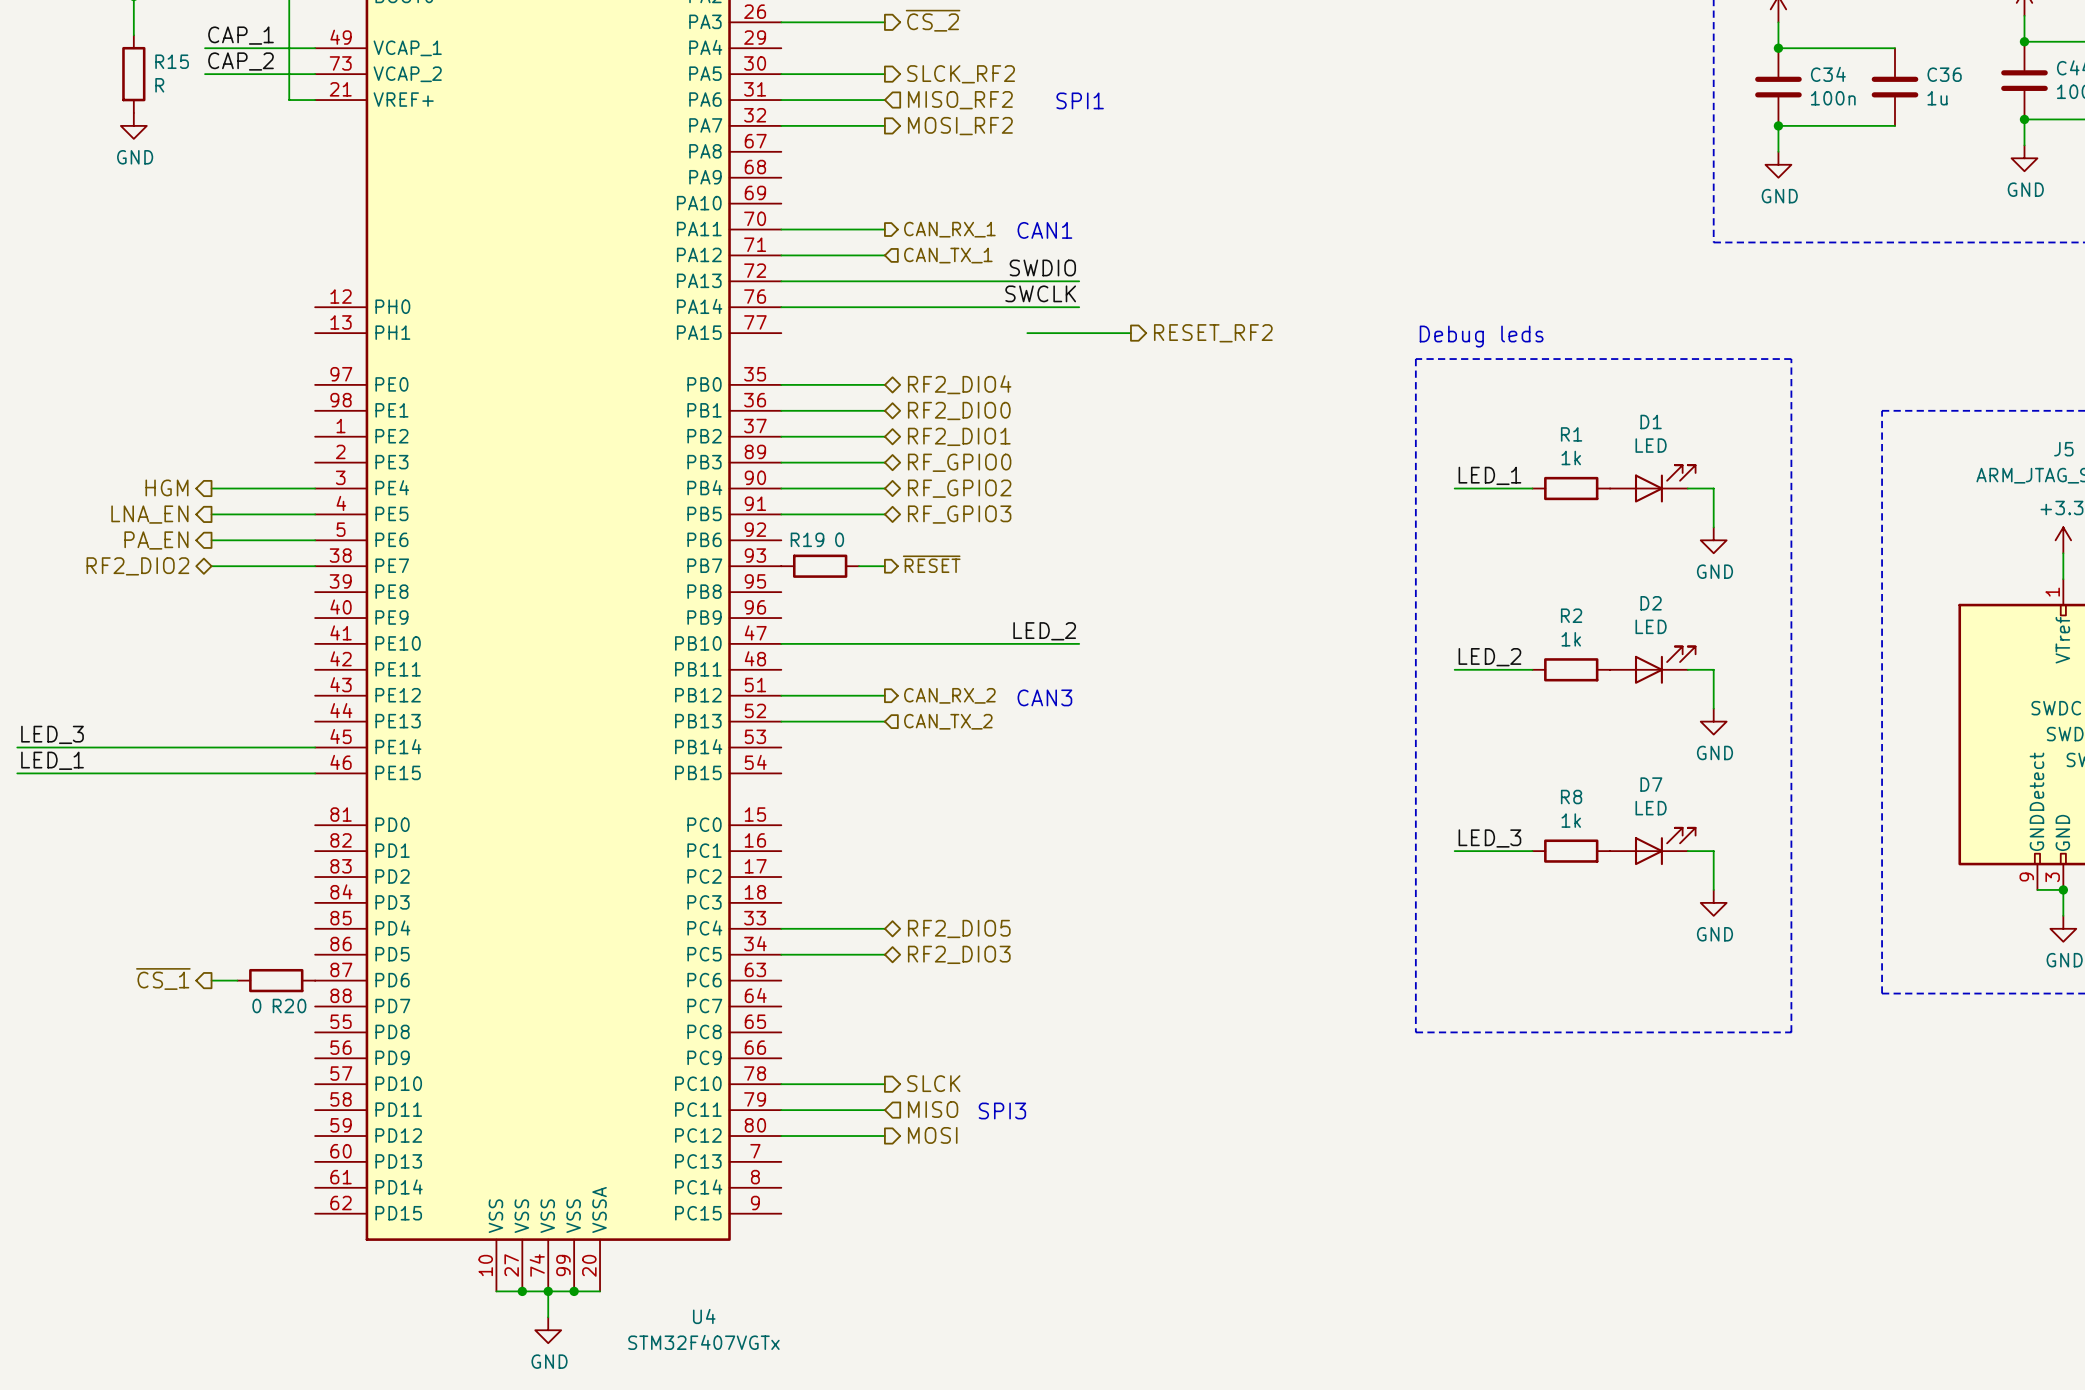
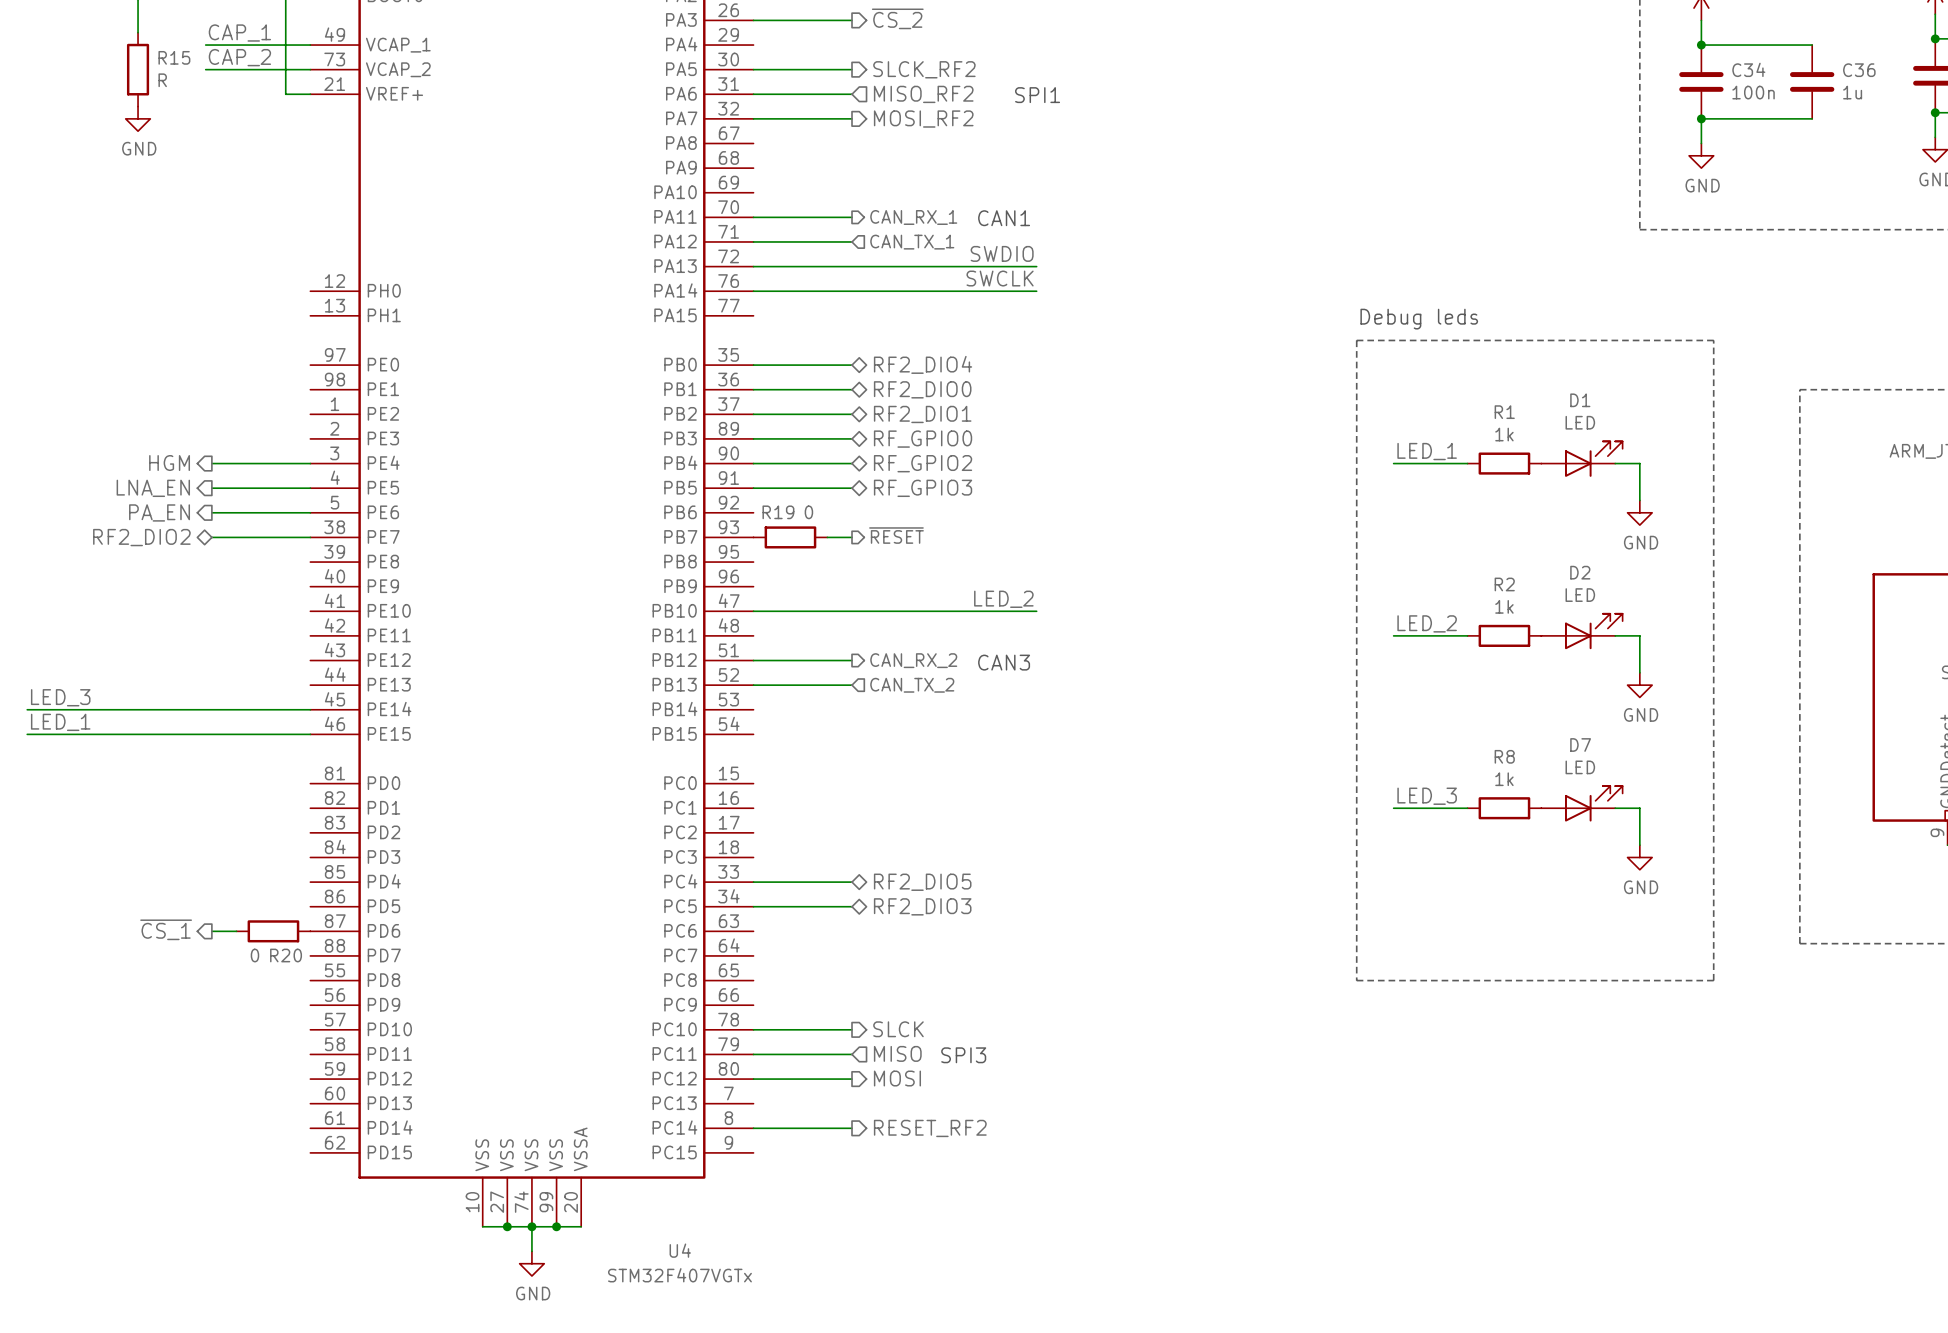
wire: (1027, 333) (1130, 333) -> none
hierarchical label: RESET_RF2 (1213, 333) -> none
wire: none -> (753, 1128) (852, 1128)
hierarchical label: none -> RESET_RF2 (930, 1128)

